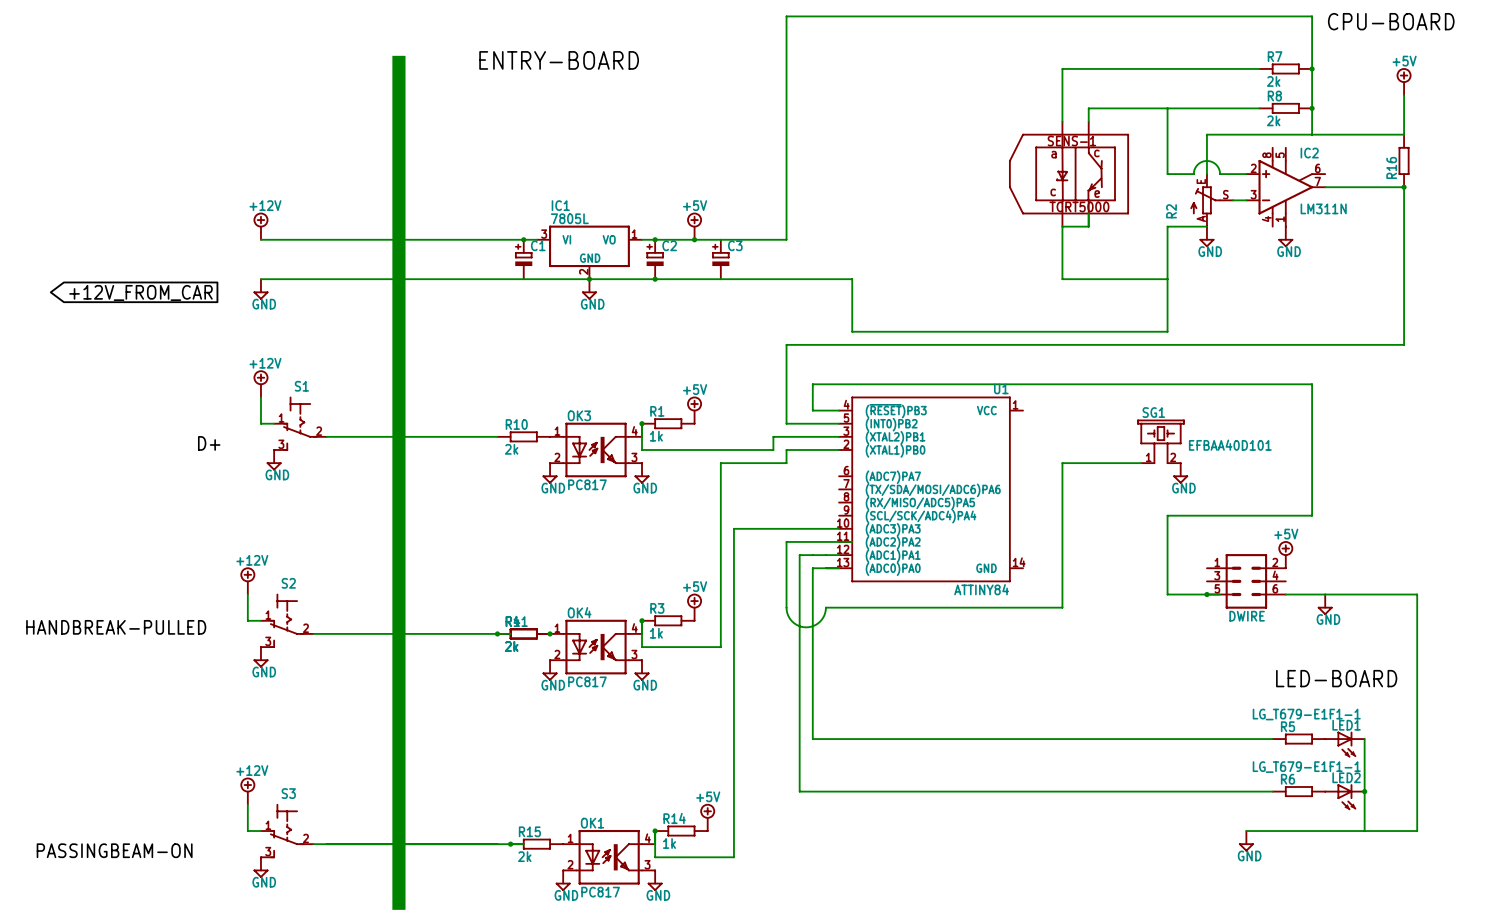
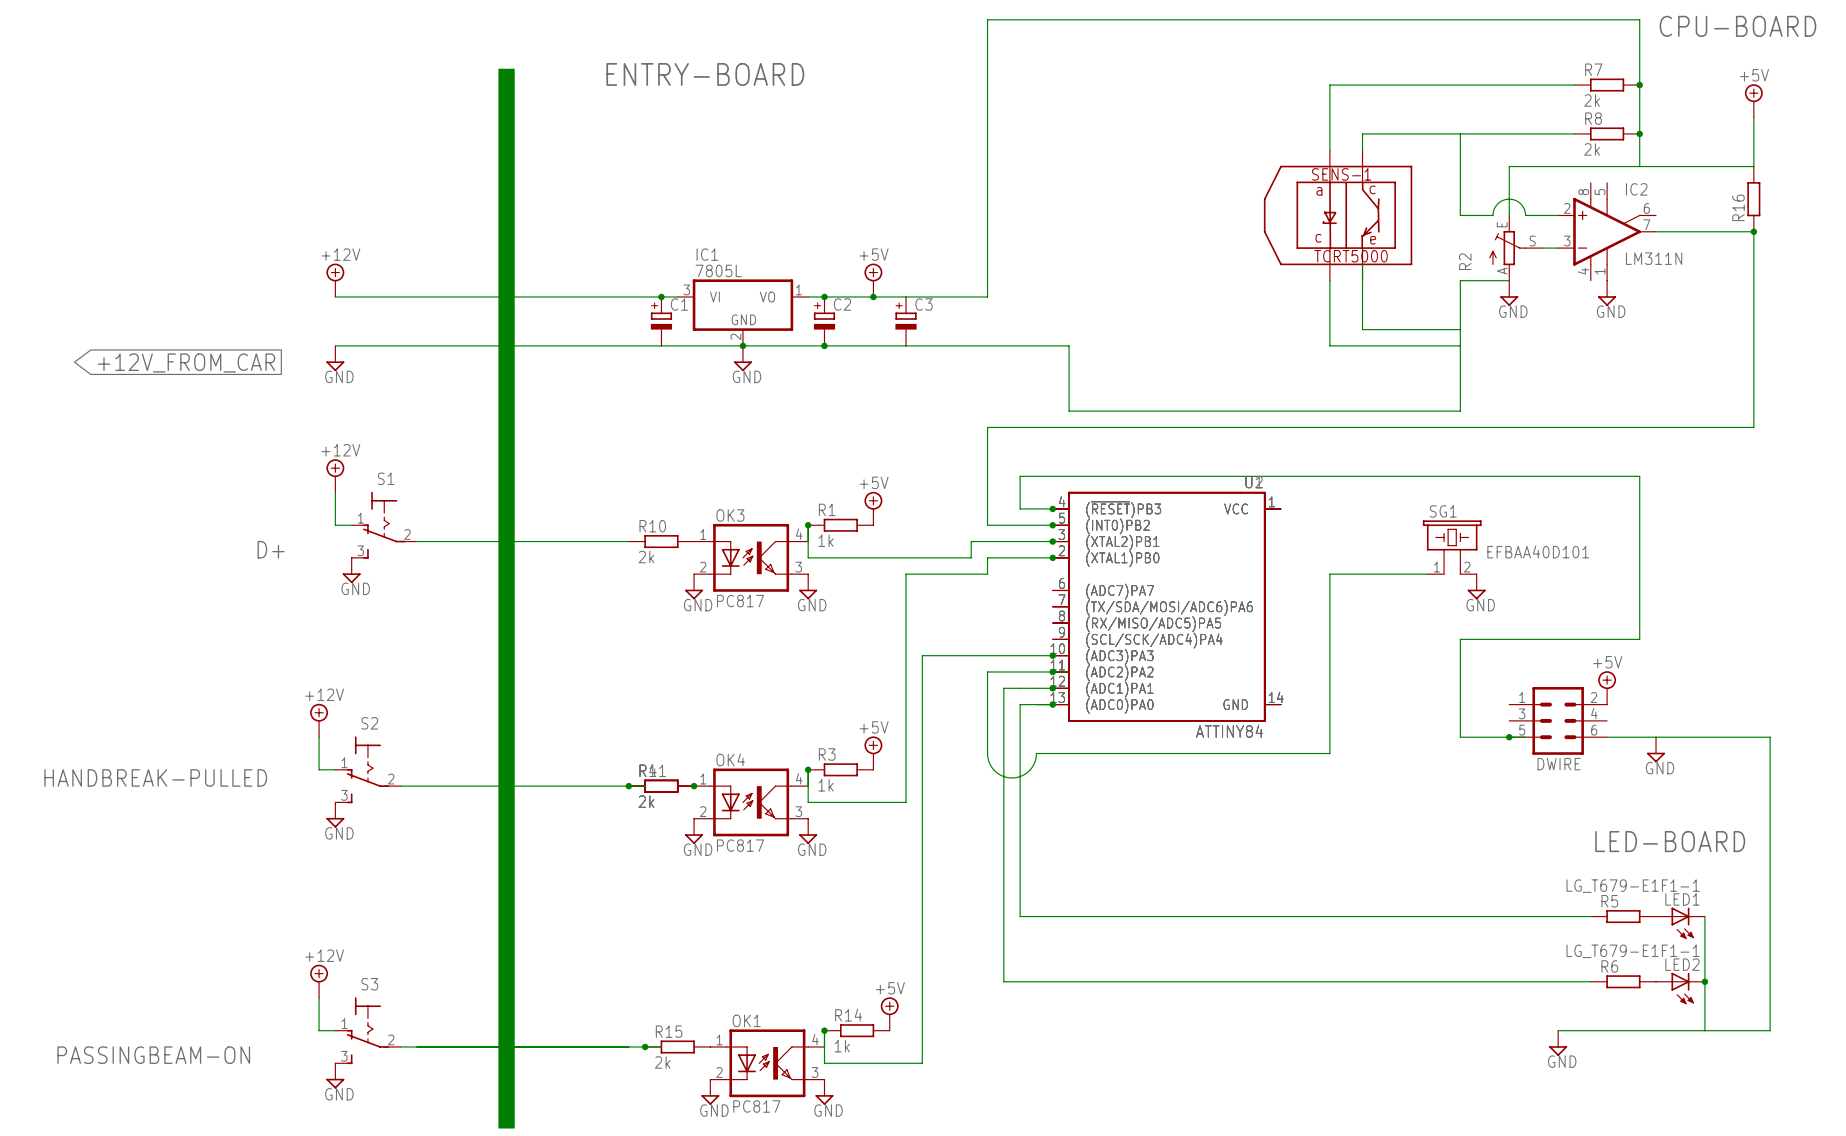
wire: (1062, 226) (1088, 226) -> (1460, 329) (1362, 329) (1362, 280)
junction: none -> (1052, 508)
junction: none -> (1052, 525)
junction: none -> (1052, 541)
junction: none -> (1052, 557)
part: none -> ATTINY84 (1166, 606)
junction: none -> (1052, 655)
junction: none -> (1052, 671)
junction: none -> (1052, 688)
junction: none -> (1052, 704)

